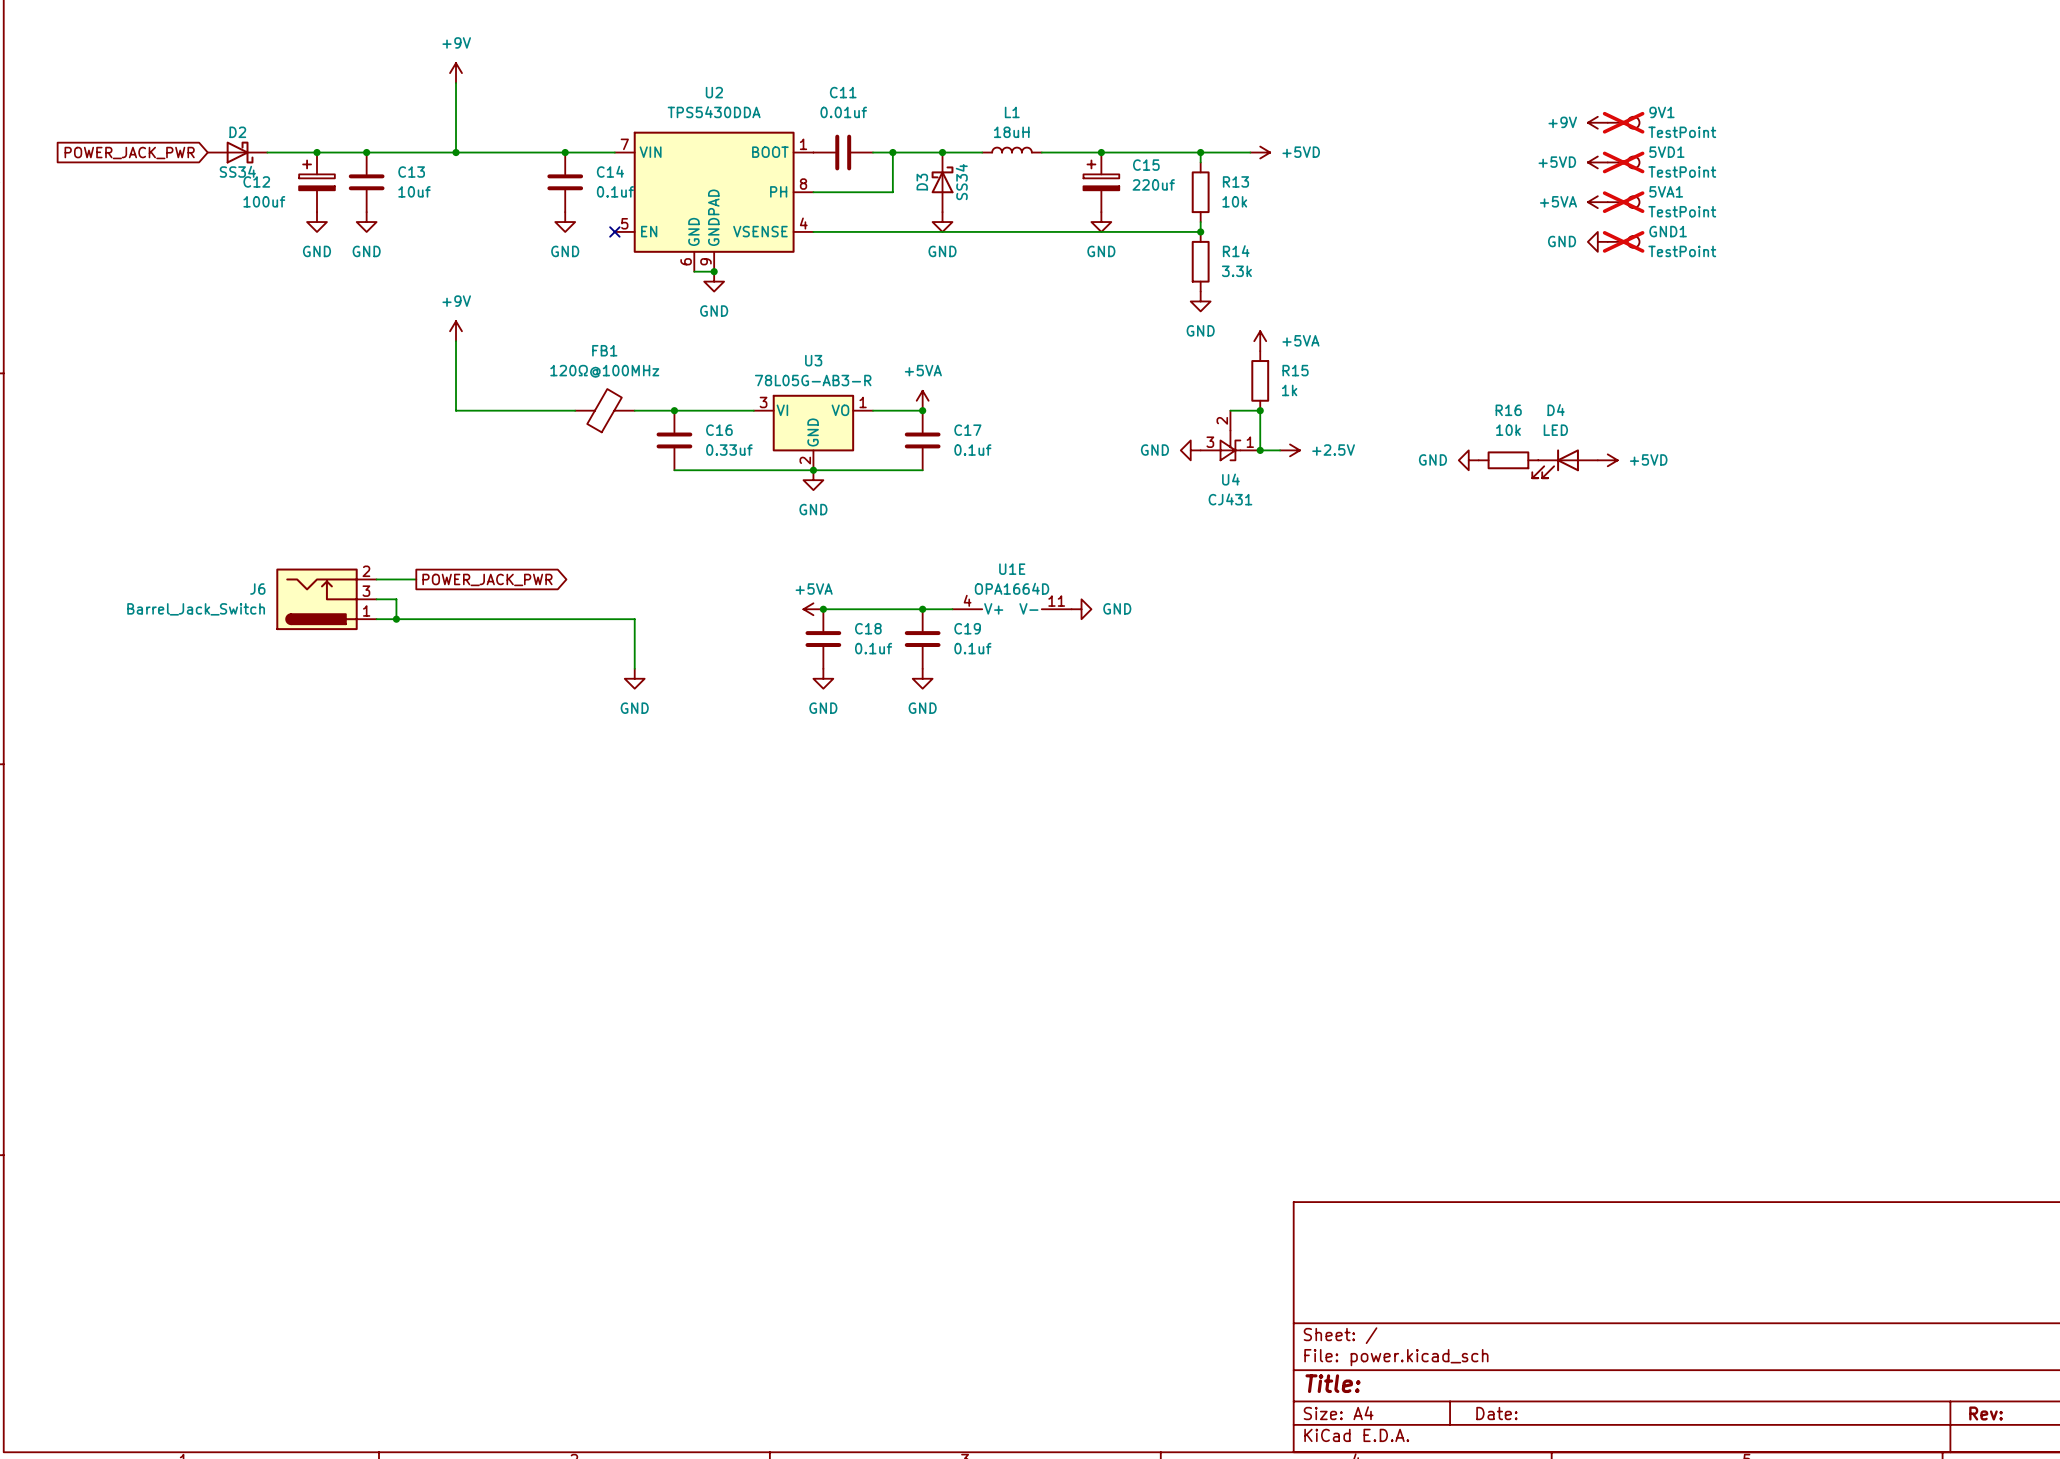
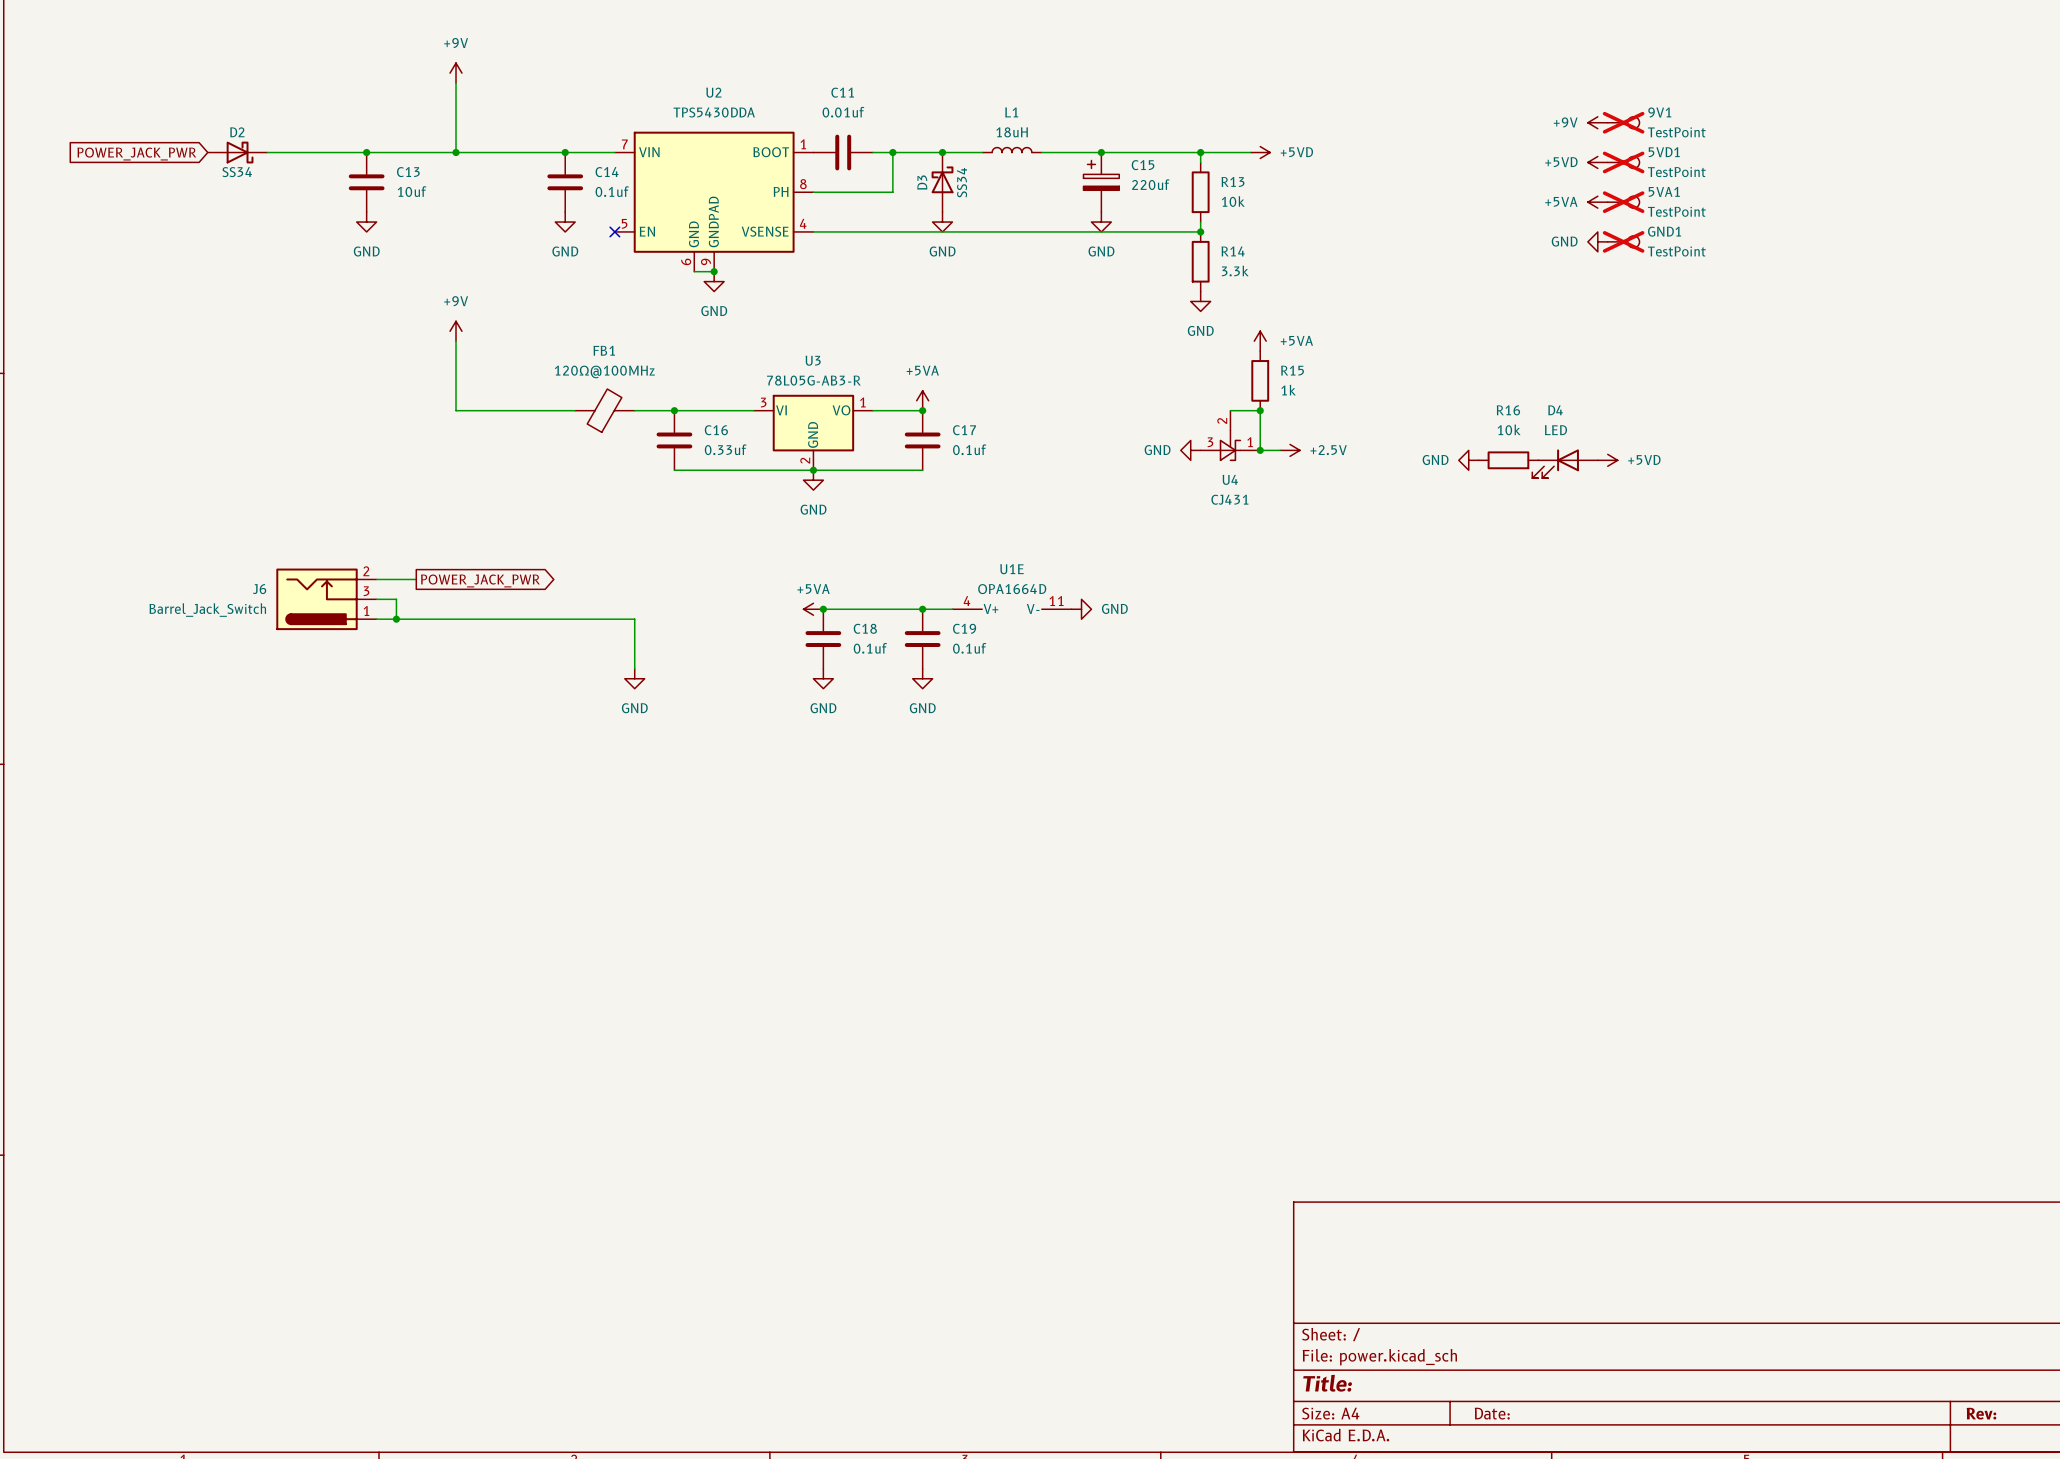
junction: (317, 152) -> none
C12: 100uf (317, 182) -> none
power symbol: GND (317, 222) -> none

